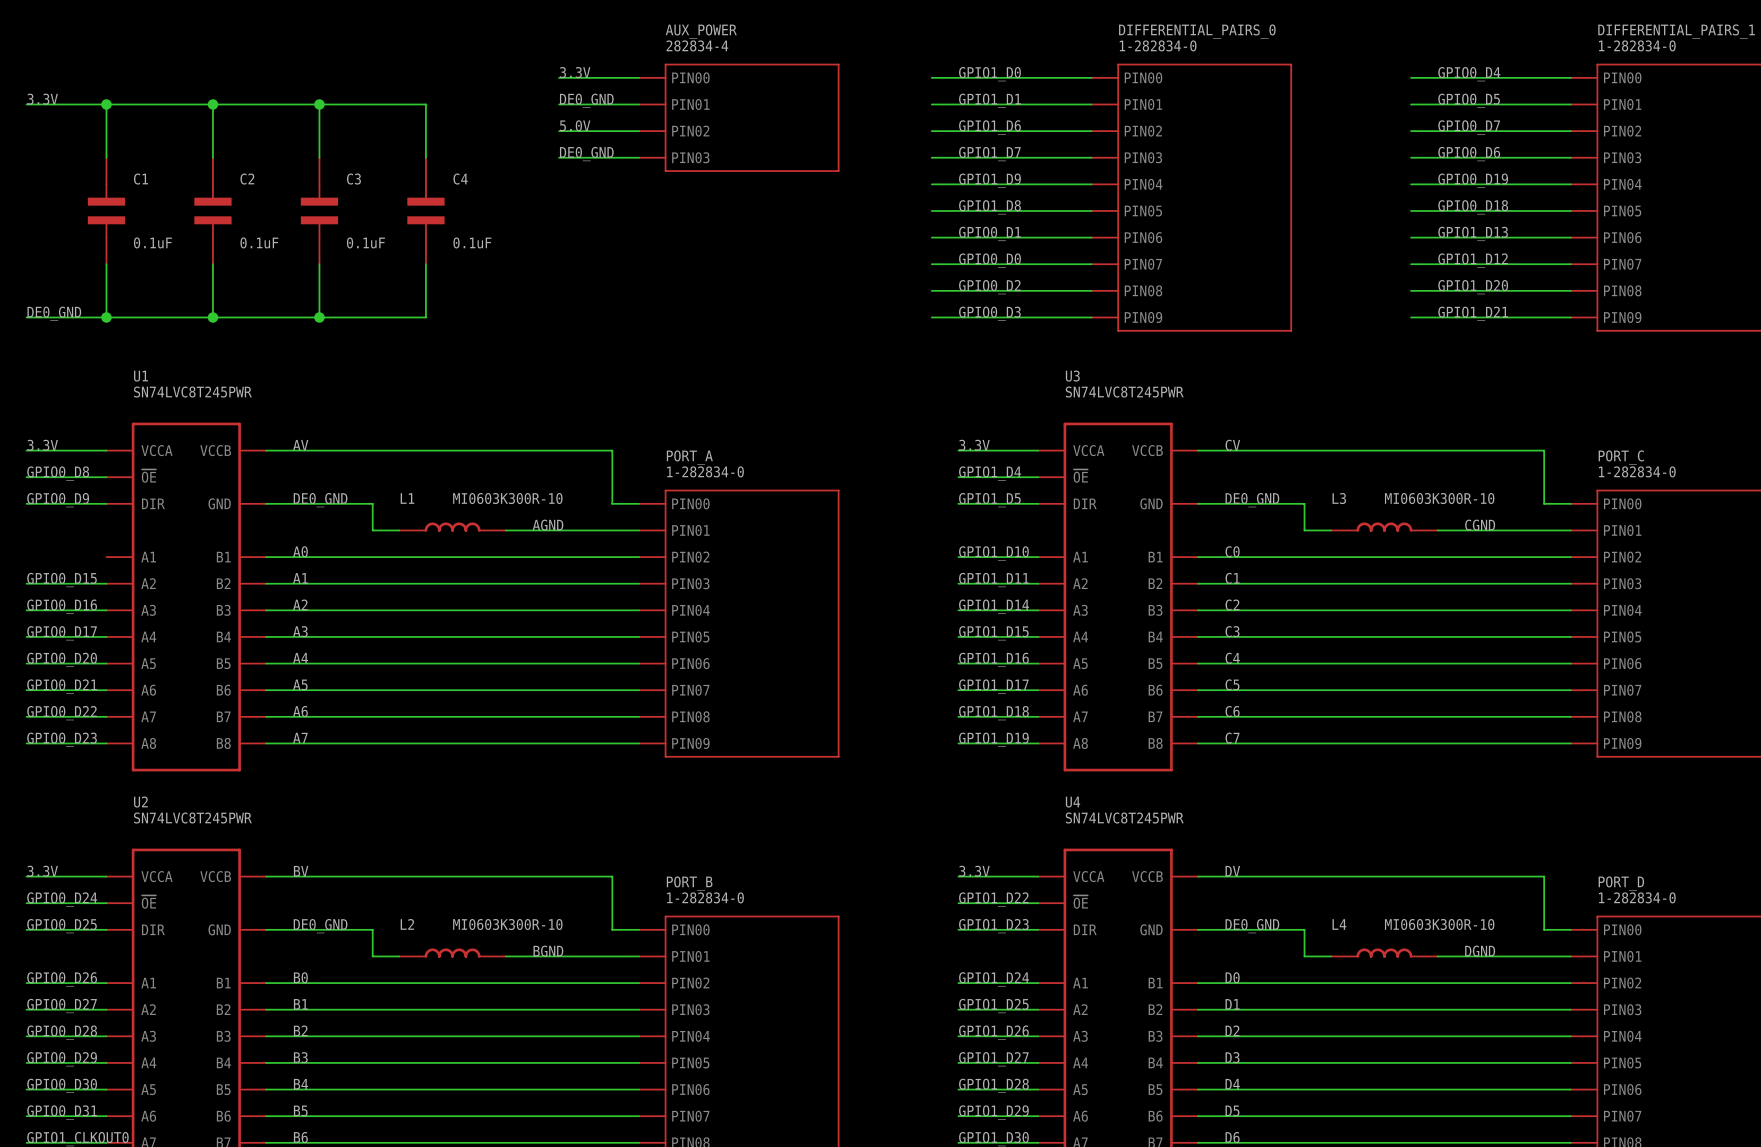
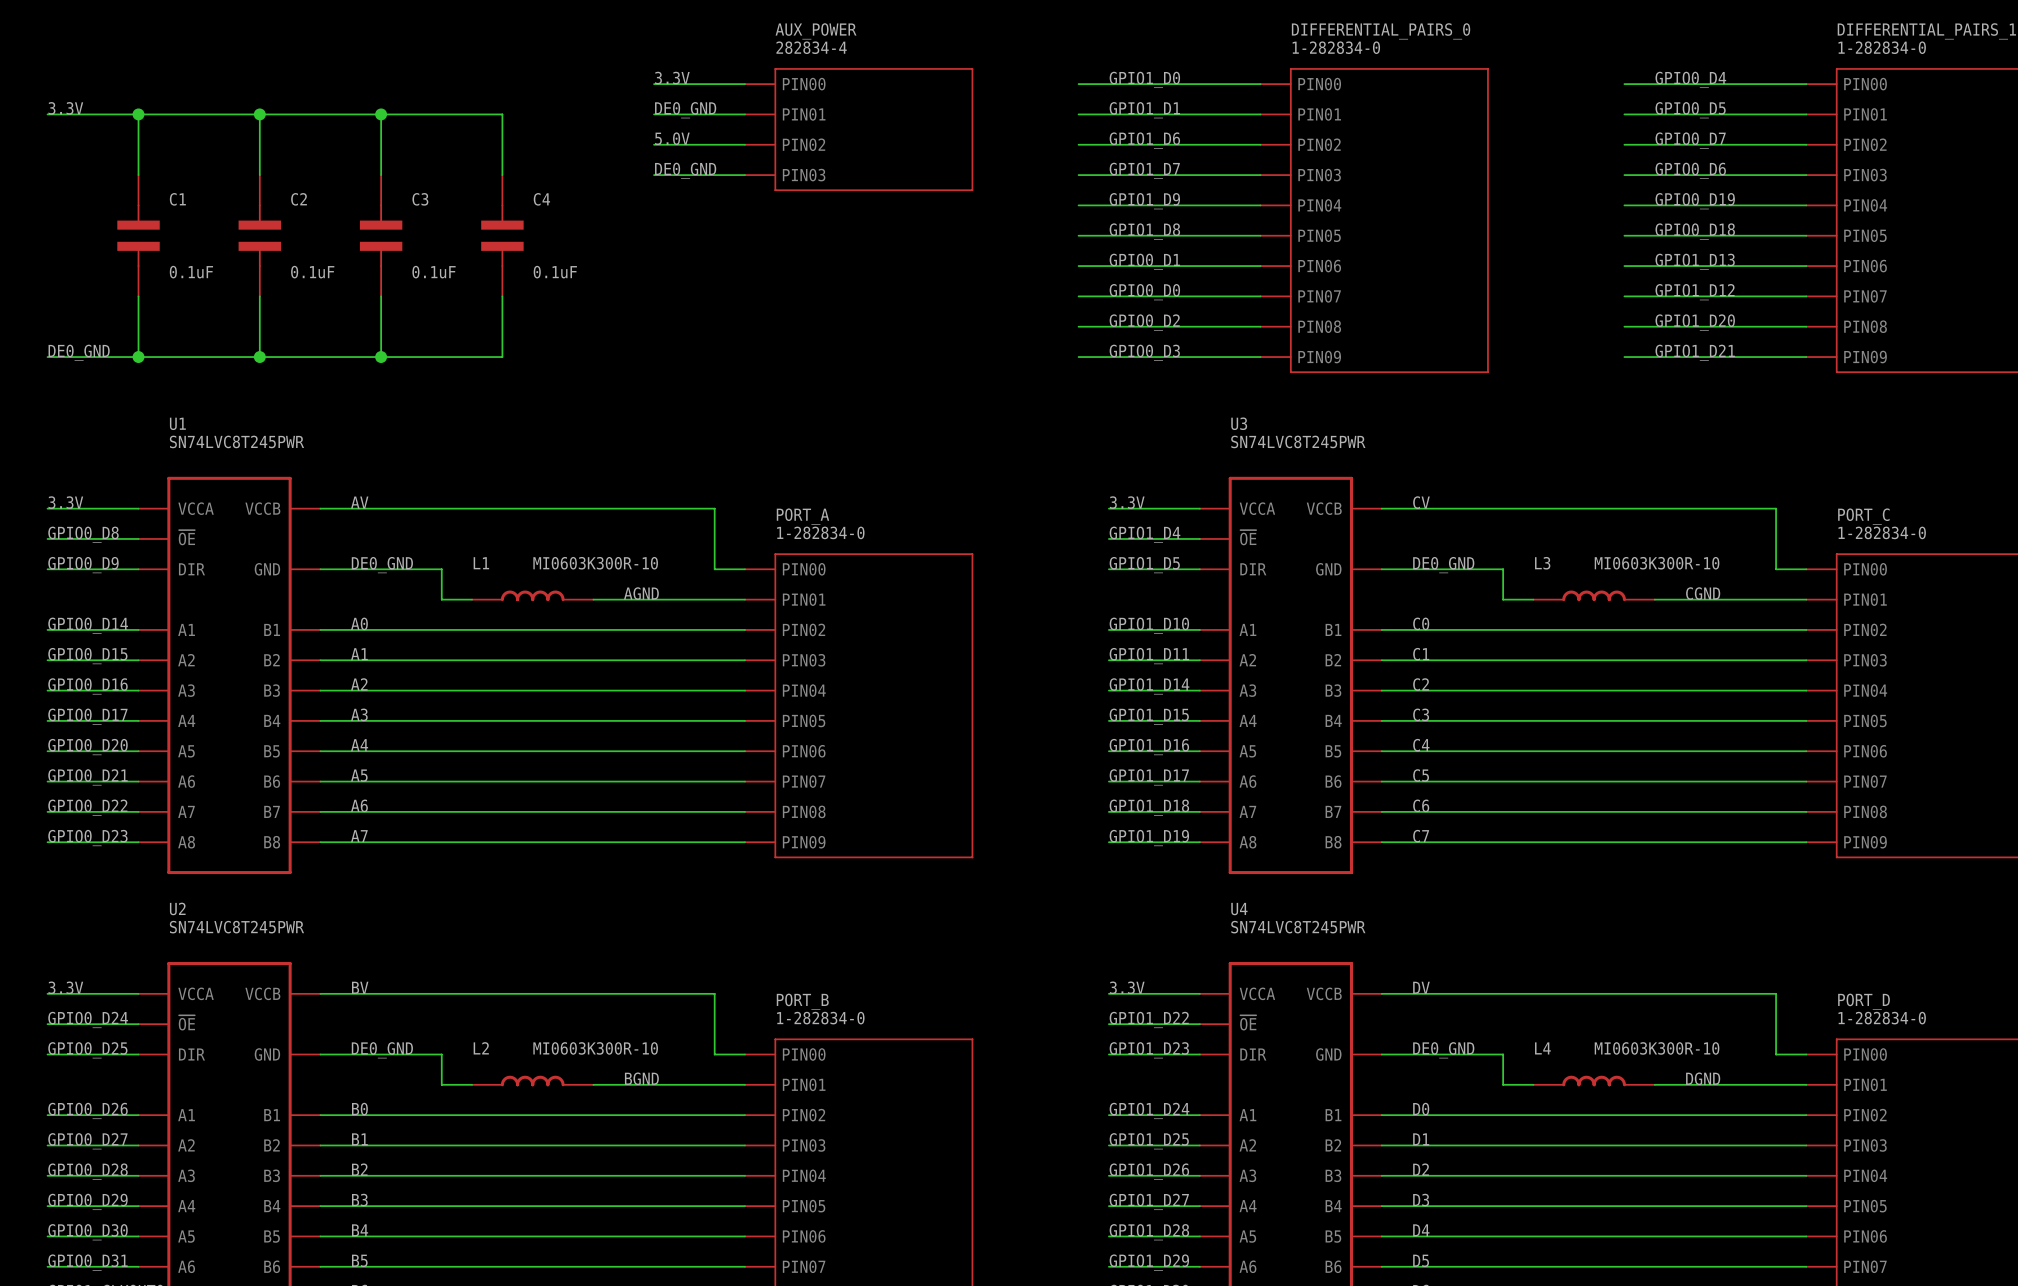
label: none -> GPIO0_D14 (88, 625)
wire: none -> (47, 629) (138, 629)

